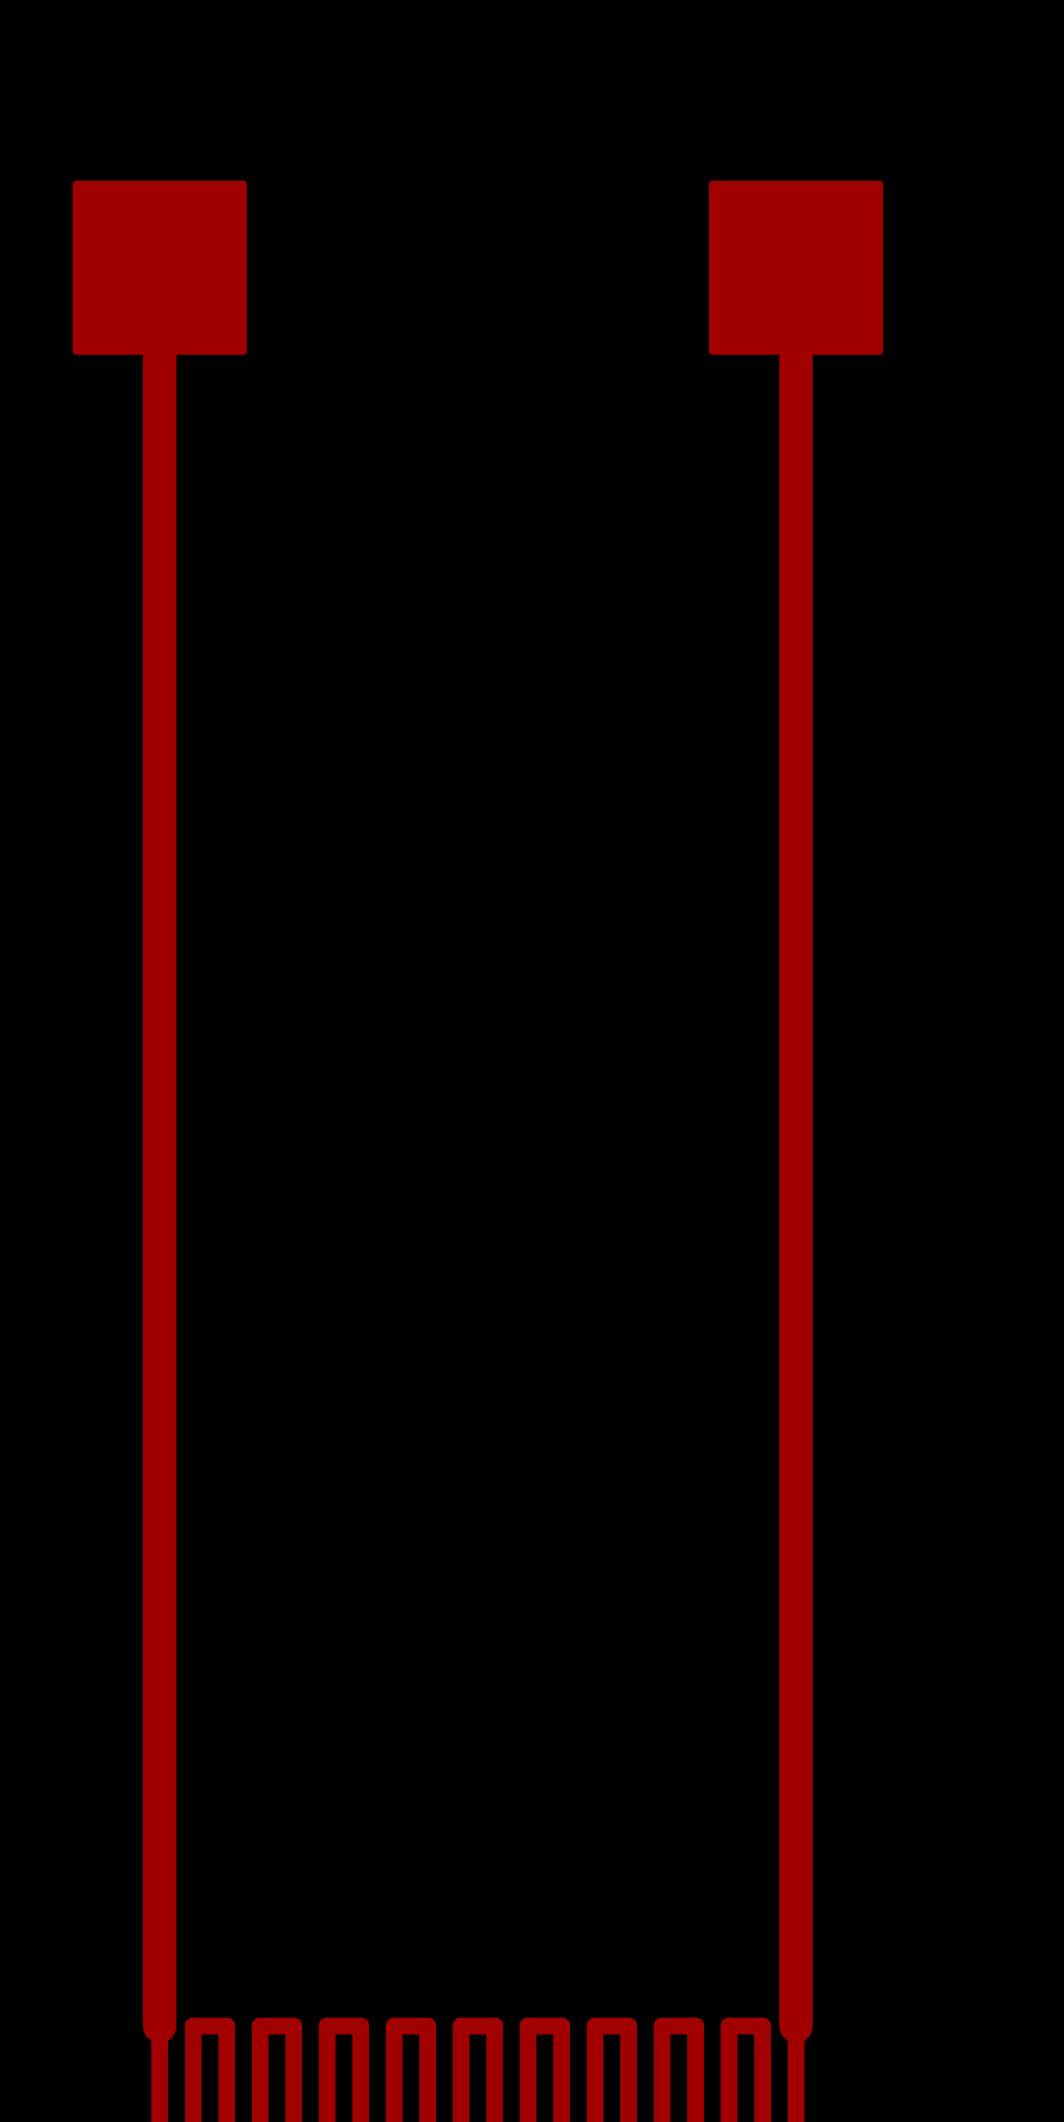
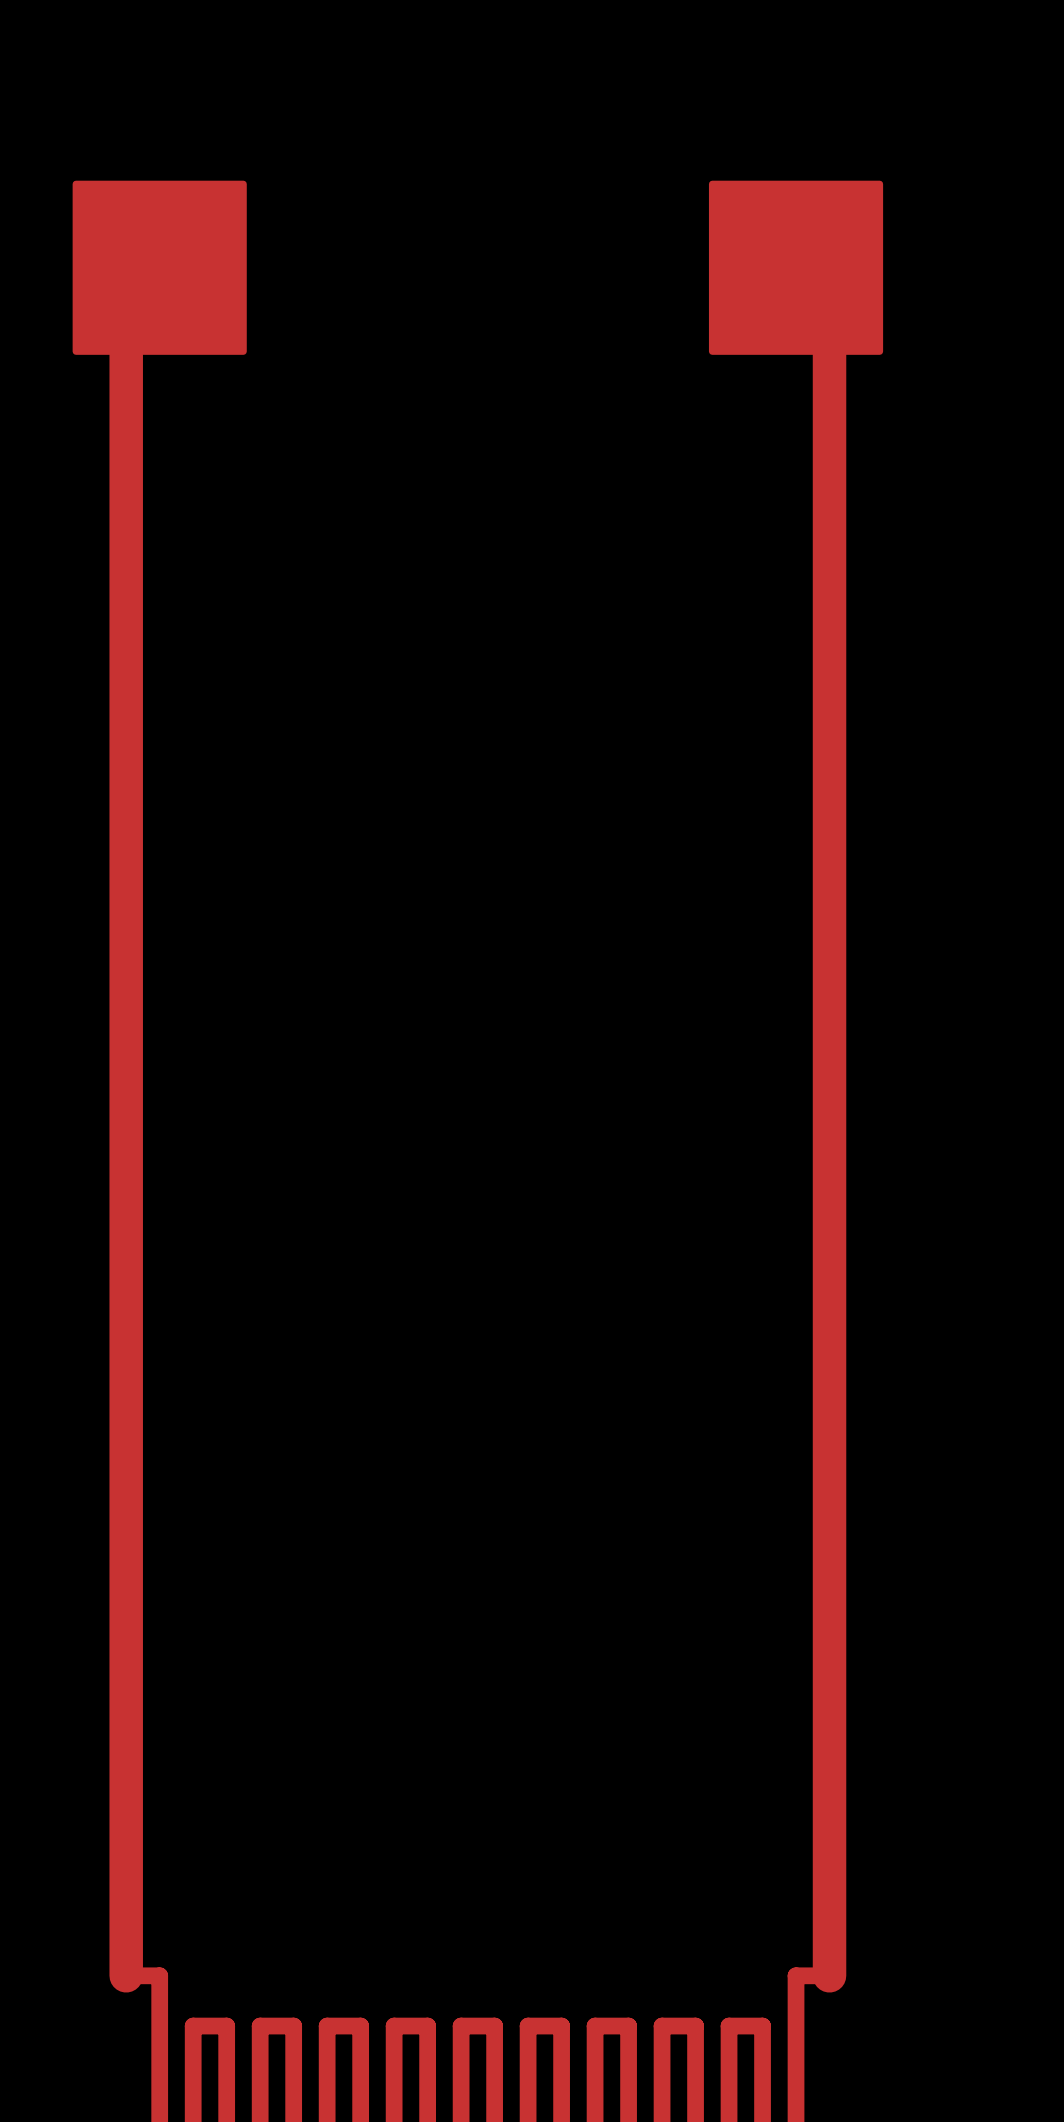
track: (159, 267) (159, 1975) -> (159, 267) (126, 301) (126, 1975) (159, 1975)
track: (796, 267) (796, 1975) -> (796, 267) (829, 301) (829, 1975) (796, 1975)
track width: thick (159, 1975) (159, 2026) -> thin (159, 1975) (159, 2026)
track width: thick (796, 1975) (796, 2026) -> thin (796, 1975) (796, 2026)

